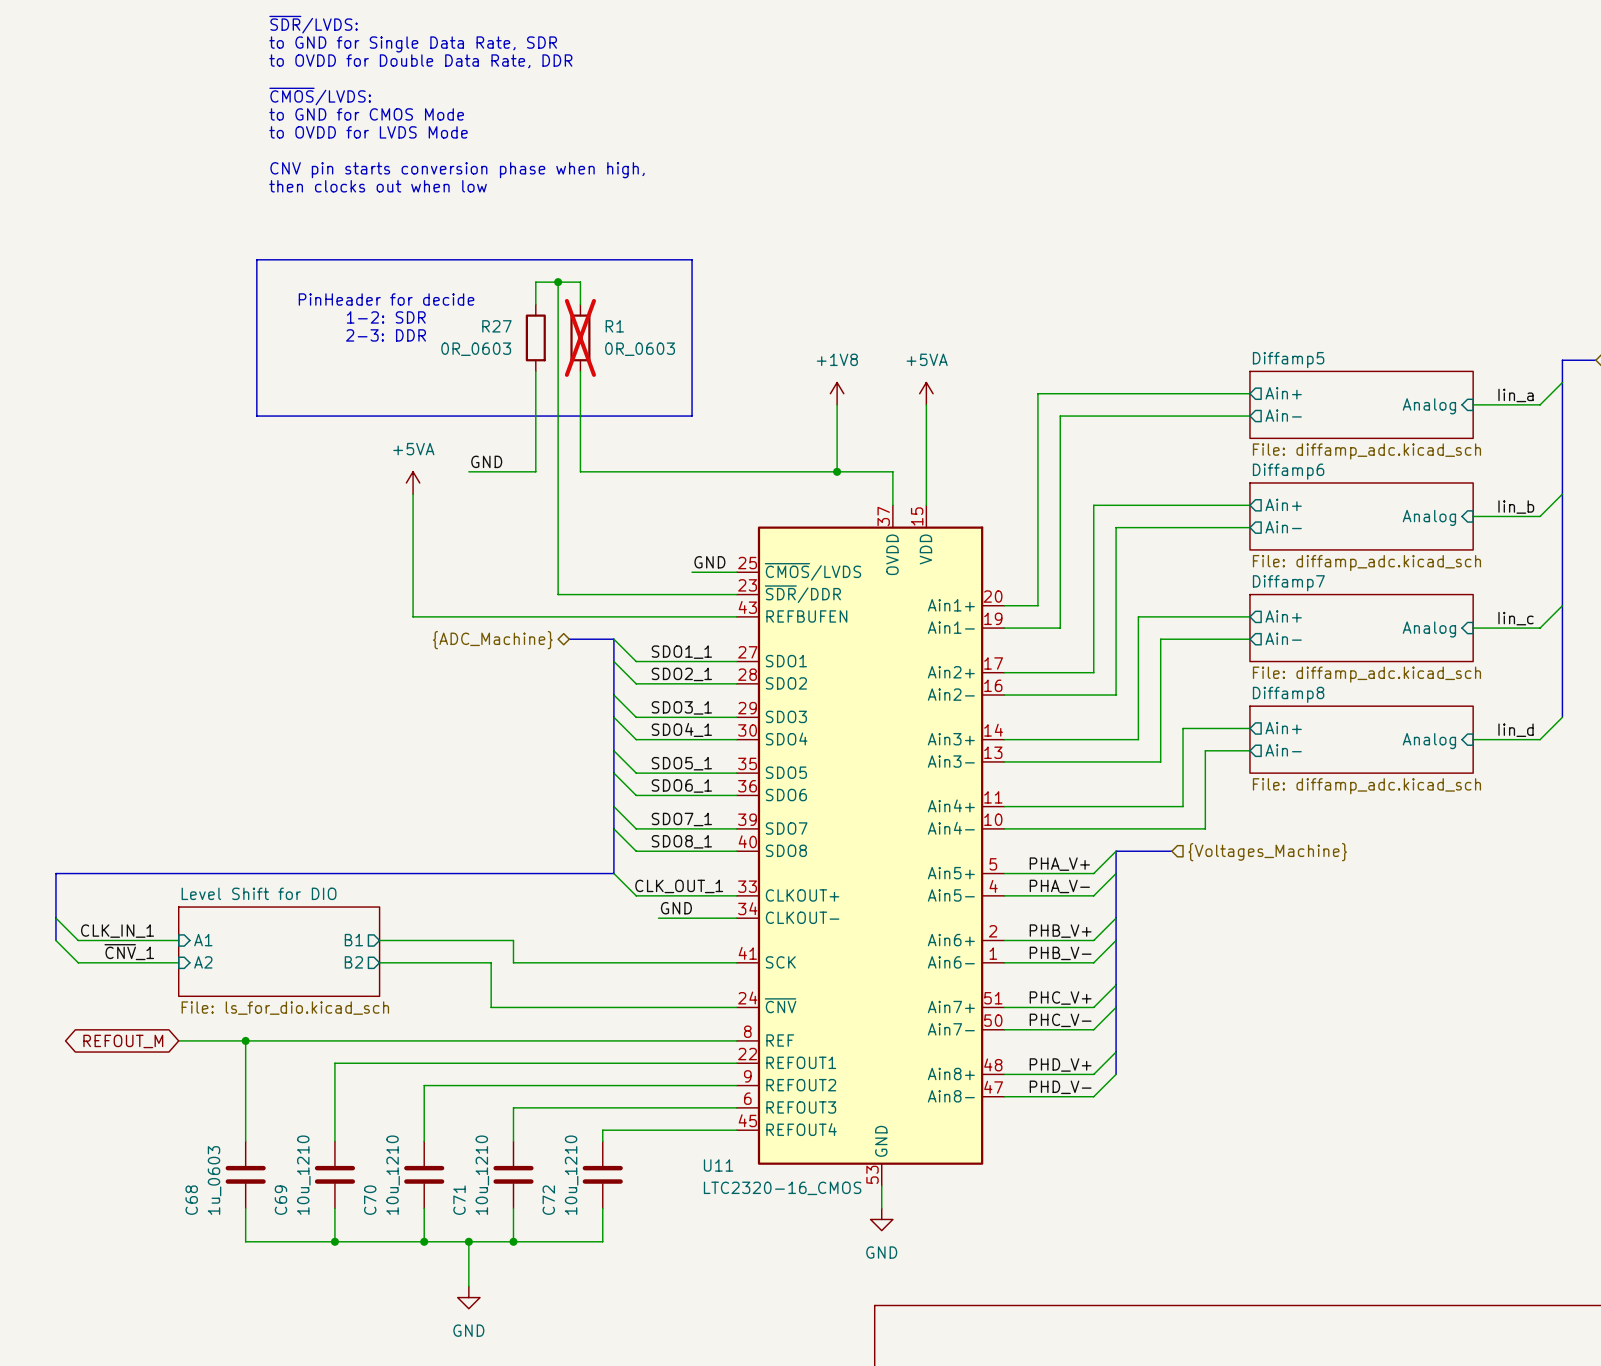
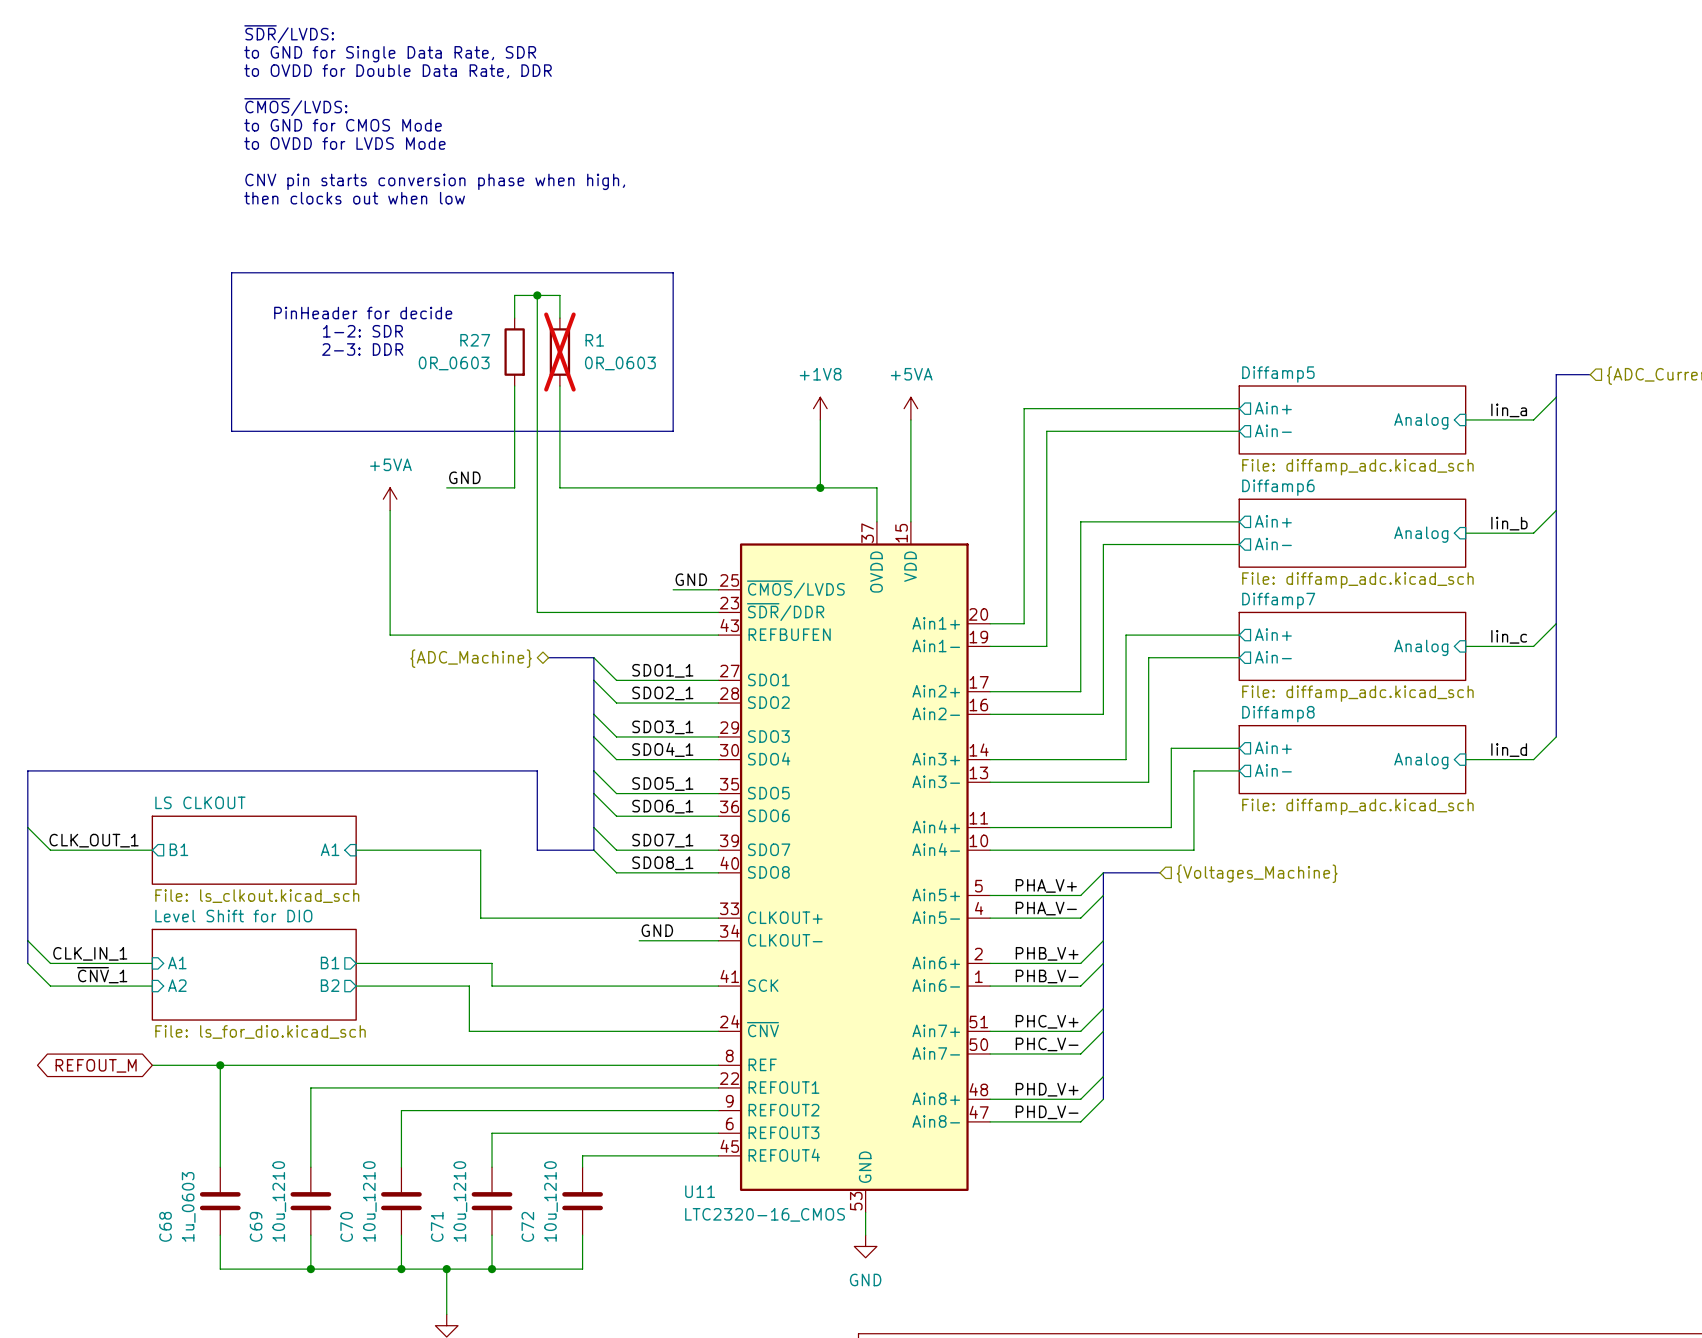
wire: none -> (27, 827) (50, 850) (152, 850)
label: none -> CLK_OUT_1 (94, 840)
sheet pin: none -> B1 (178, 849)
sheet LS CLKOUT: none -> File: ls_clkout.kicad_sch (254, 850)
sheet pin: none -> A1 (330, 849)
bus: (613, 828) (613, 873) (55, 873) -> (593, 850) (537, 850) (537, 770) (27, 770) (27, 895)
wire: (613, 873) (636, 895) -> (356, 850) (480, 850) (480, 918) (616, 918)
label: CLK_OUT_1 (679, 886) -> none

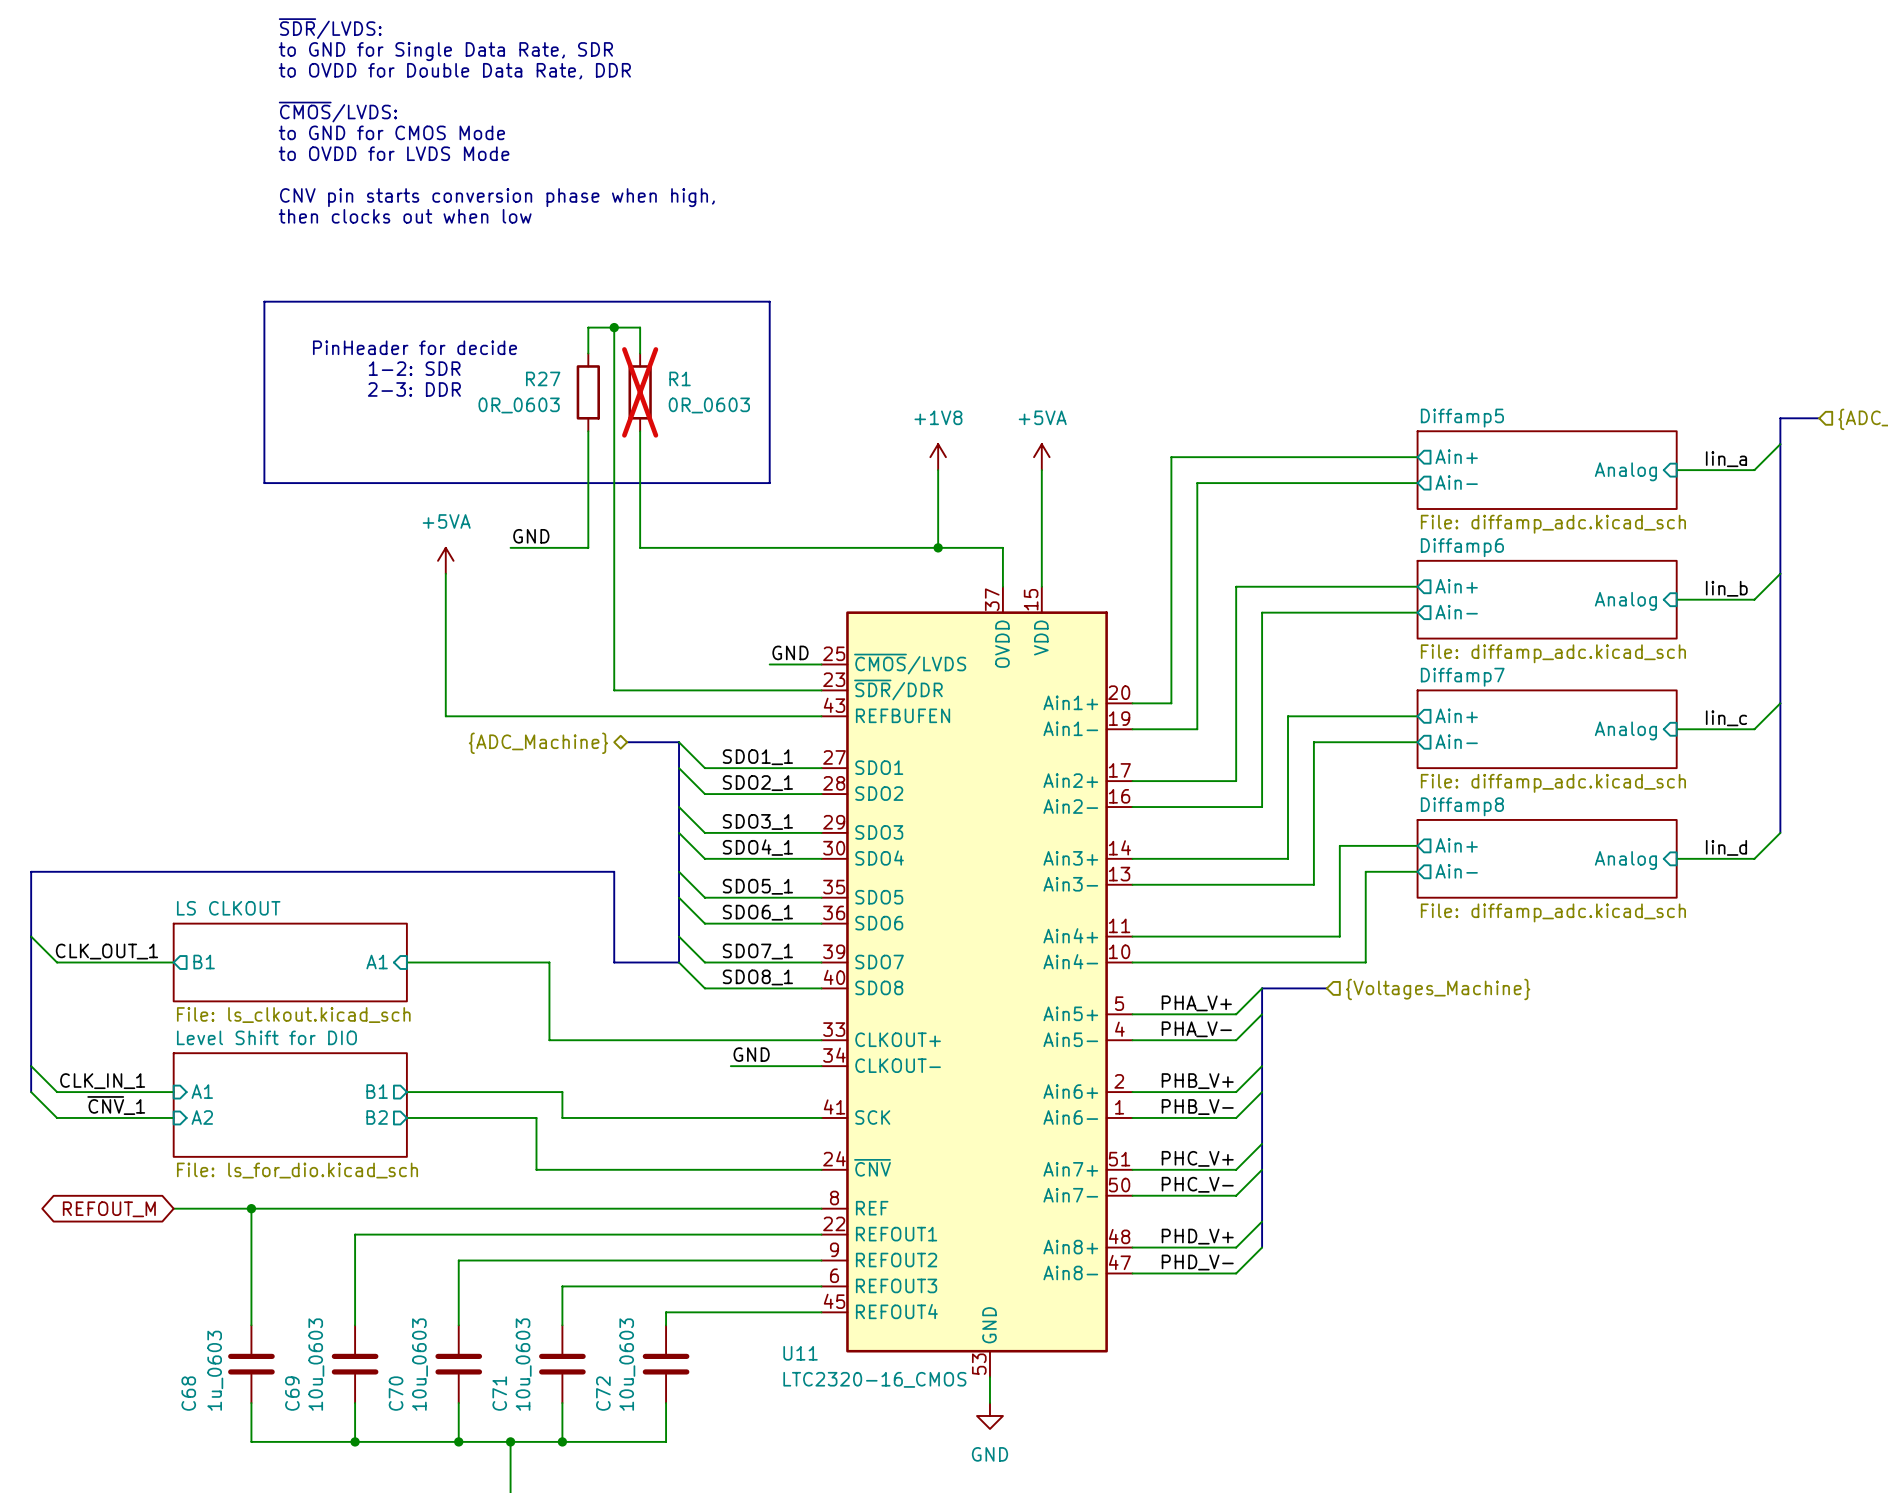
C69 value: 10u_1210 (279, 1201) -> 10u_0603 (316, 1364)
C70 value: 10u_1210 (369, 1201) -> 10u_0603 (420, 1364)
C71 value: 10u_1210 (460, 1201) -> 10u_0603 (523, 1364)
C72 value: 10u_1210 (550, 1201) -> 10u_0603 (627, 1364)

